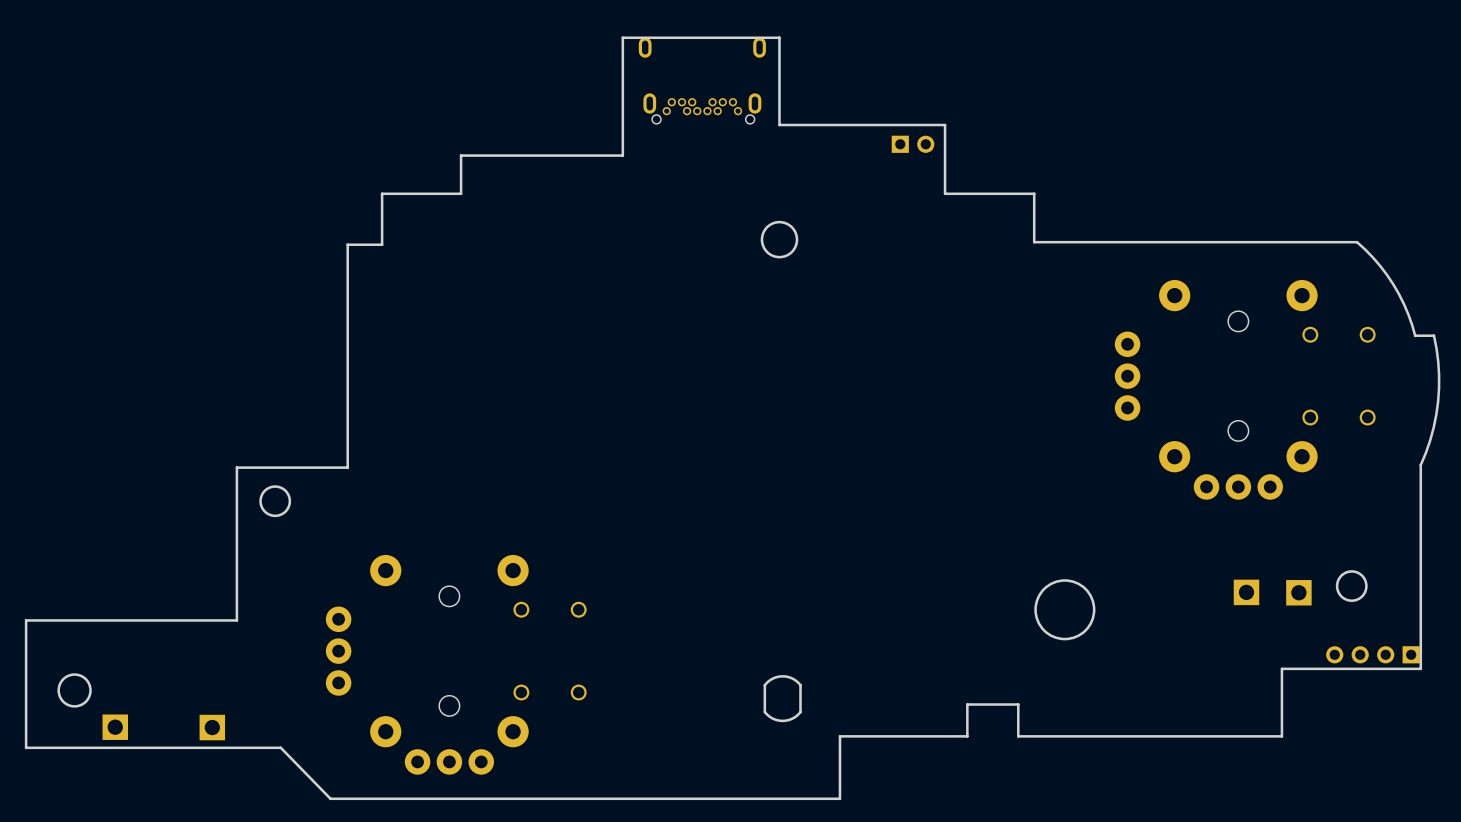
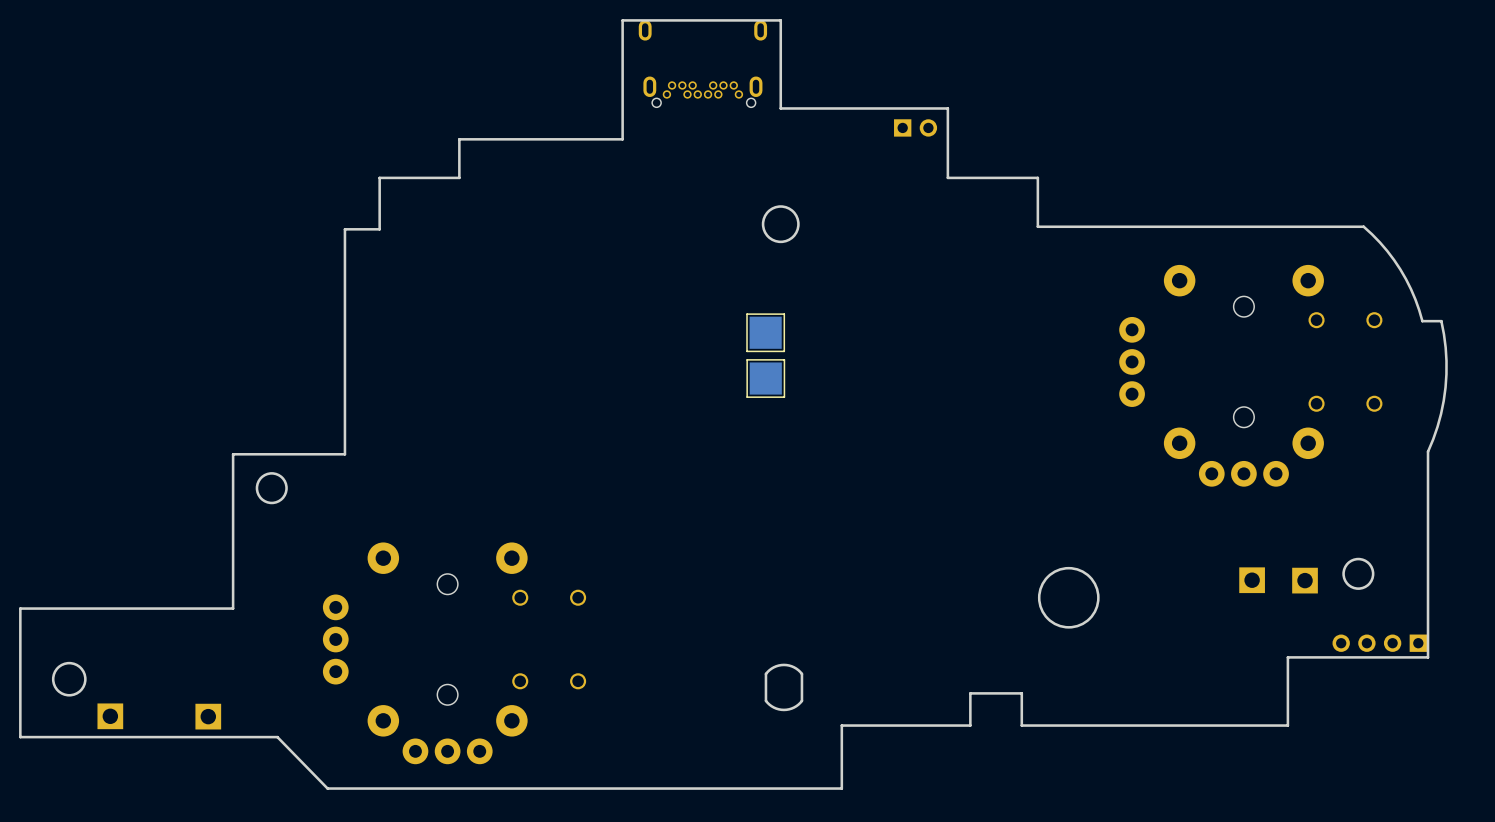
part: none -> (765, 332)
part: none -> (765, 378)

